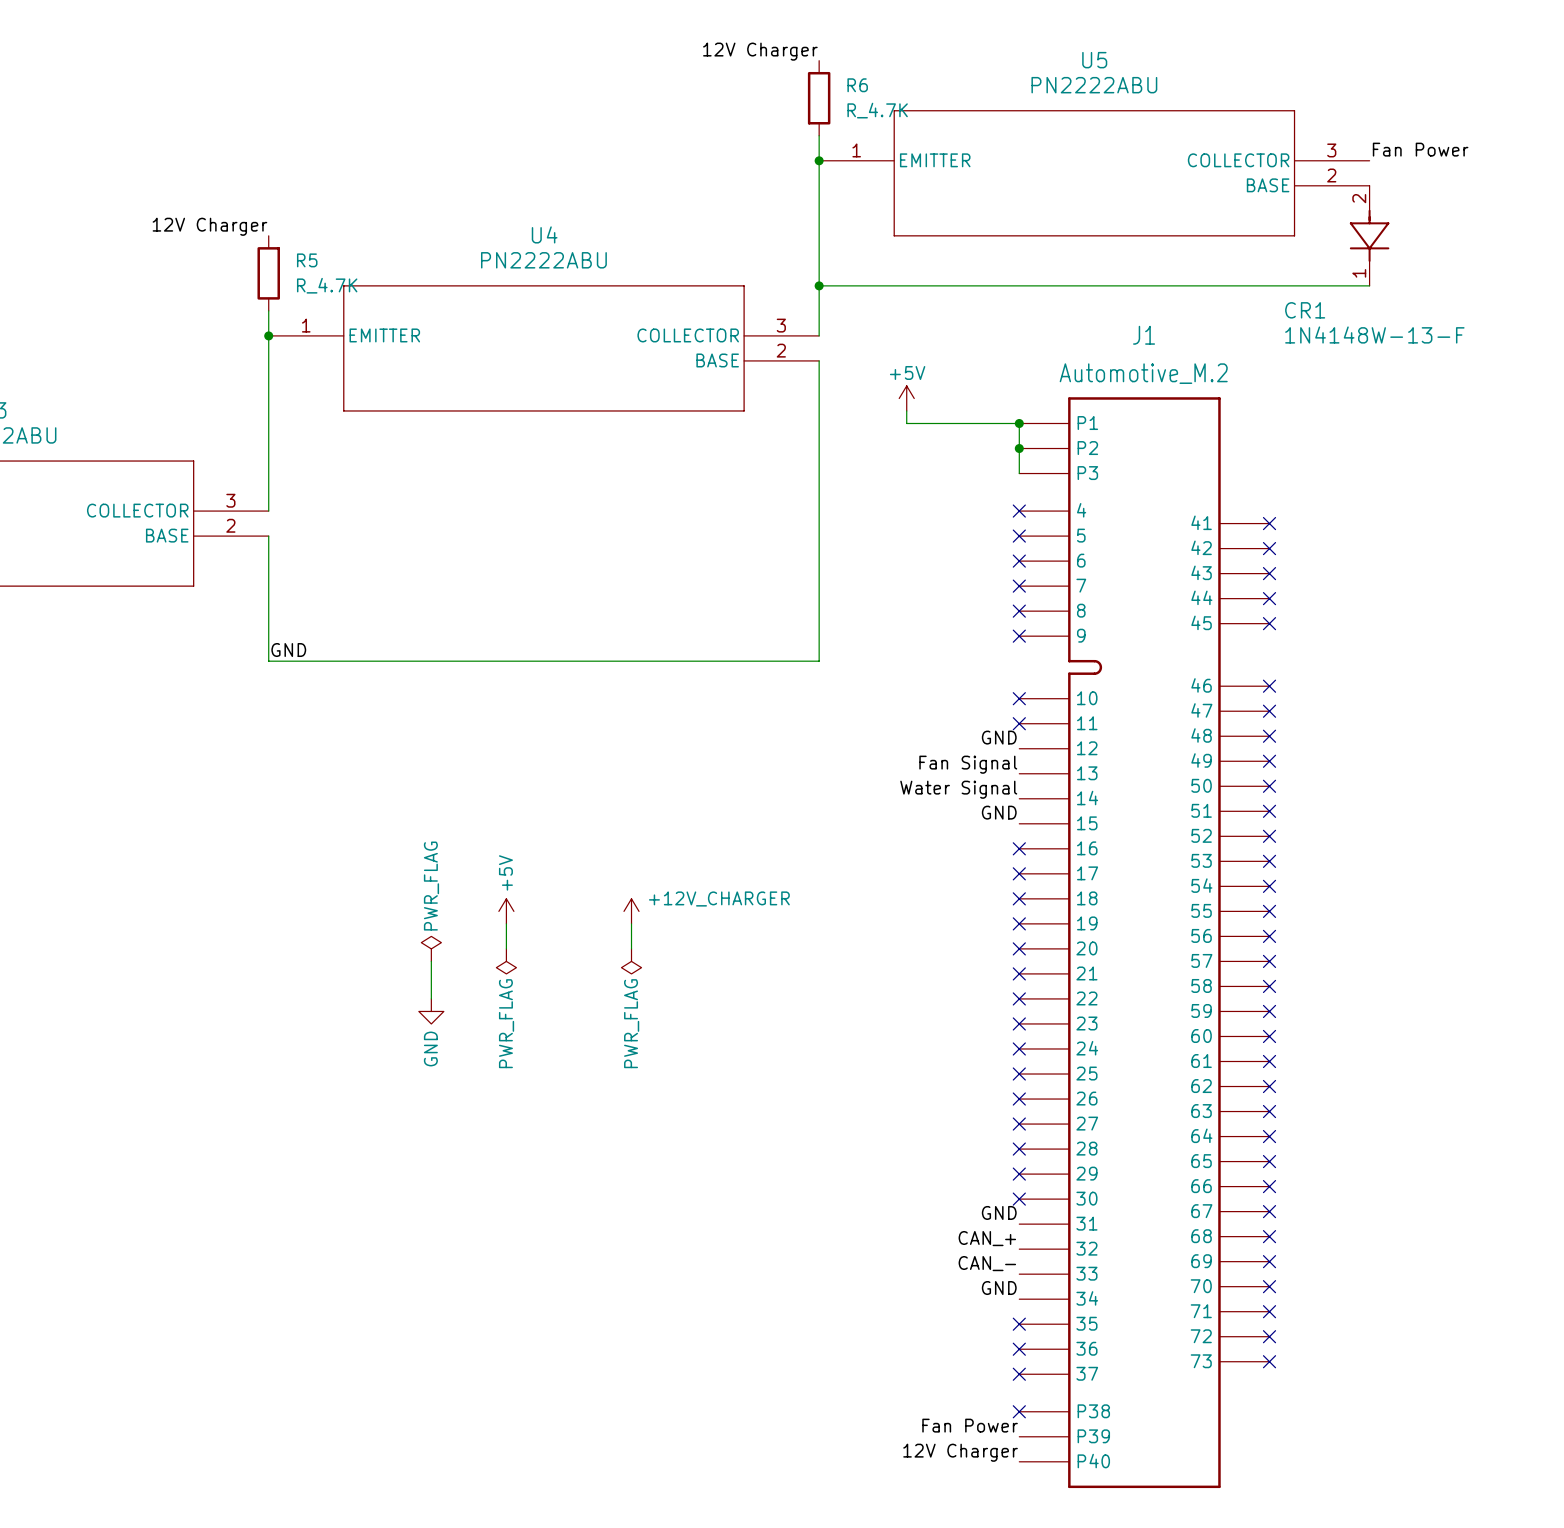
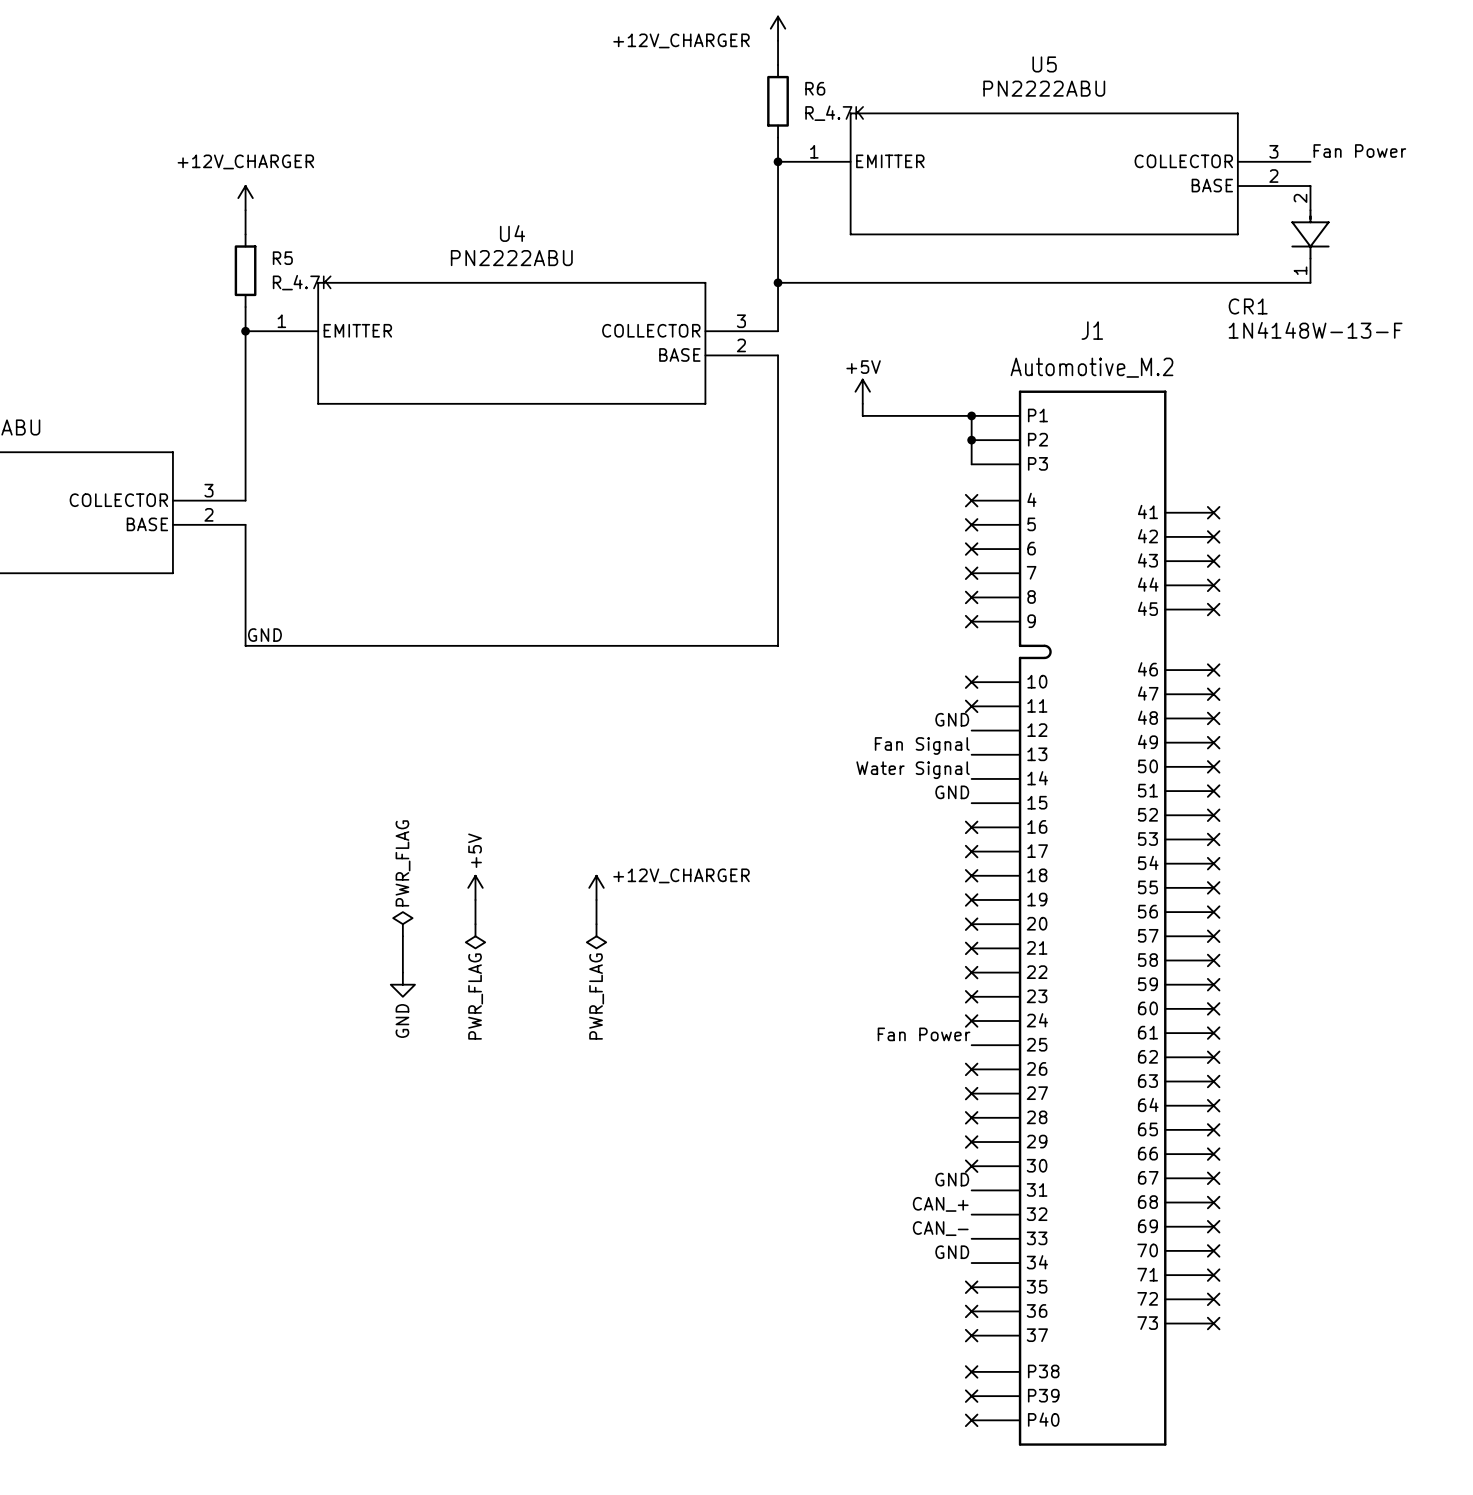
power symbol: none -> +12V_CHARGER (778, 28)
wire: none -> (778, 40) (778, 64)
label: 12V Charger (760, 51) -> none
power symbol: none -> +12V_CHARGER (245, 198)
wire: none -> (245, 210) (245, 234)
label: 12V Charger (209, 226) -> none
label: none -> Fan Power (924, 1034)
no-connect mark: (1019, 1074) -> none
label: Fan Power (970, 1425) -> none
no-connect mark: none -> (971, 1396)
label: 12V Charger (960, 1452) -> none
no-connect mark: none -> (971, 1420)

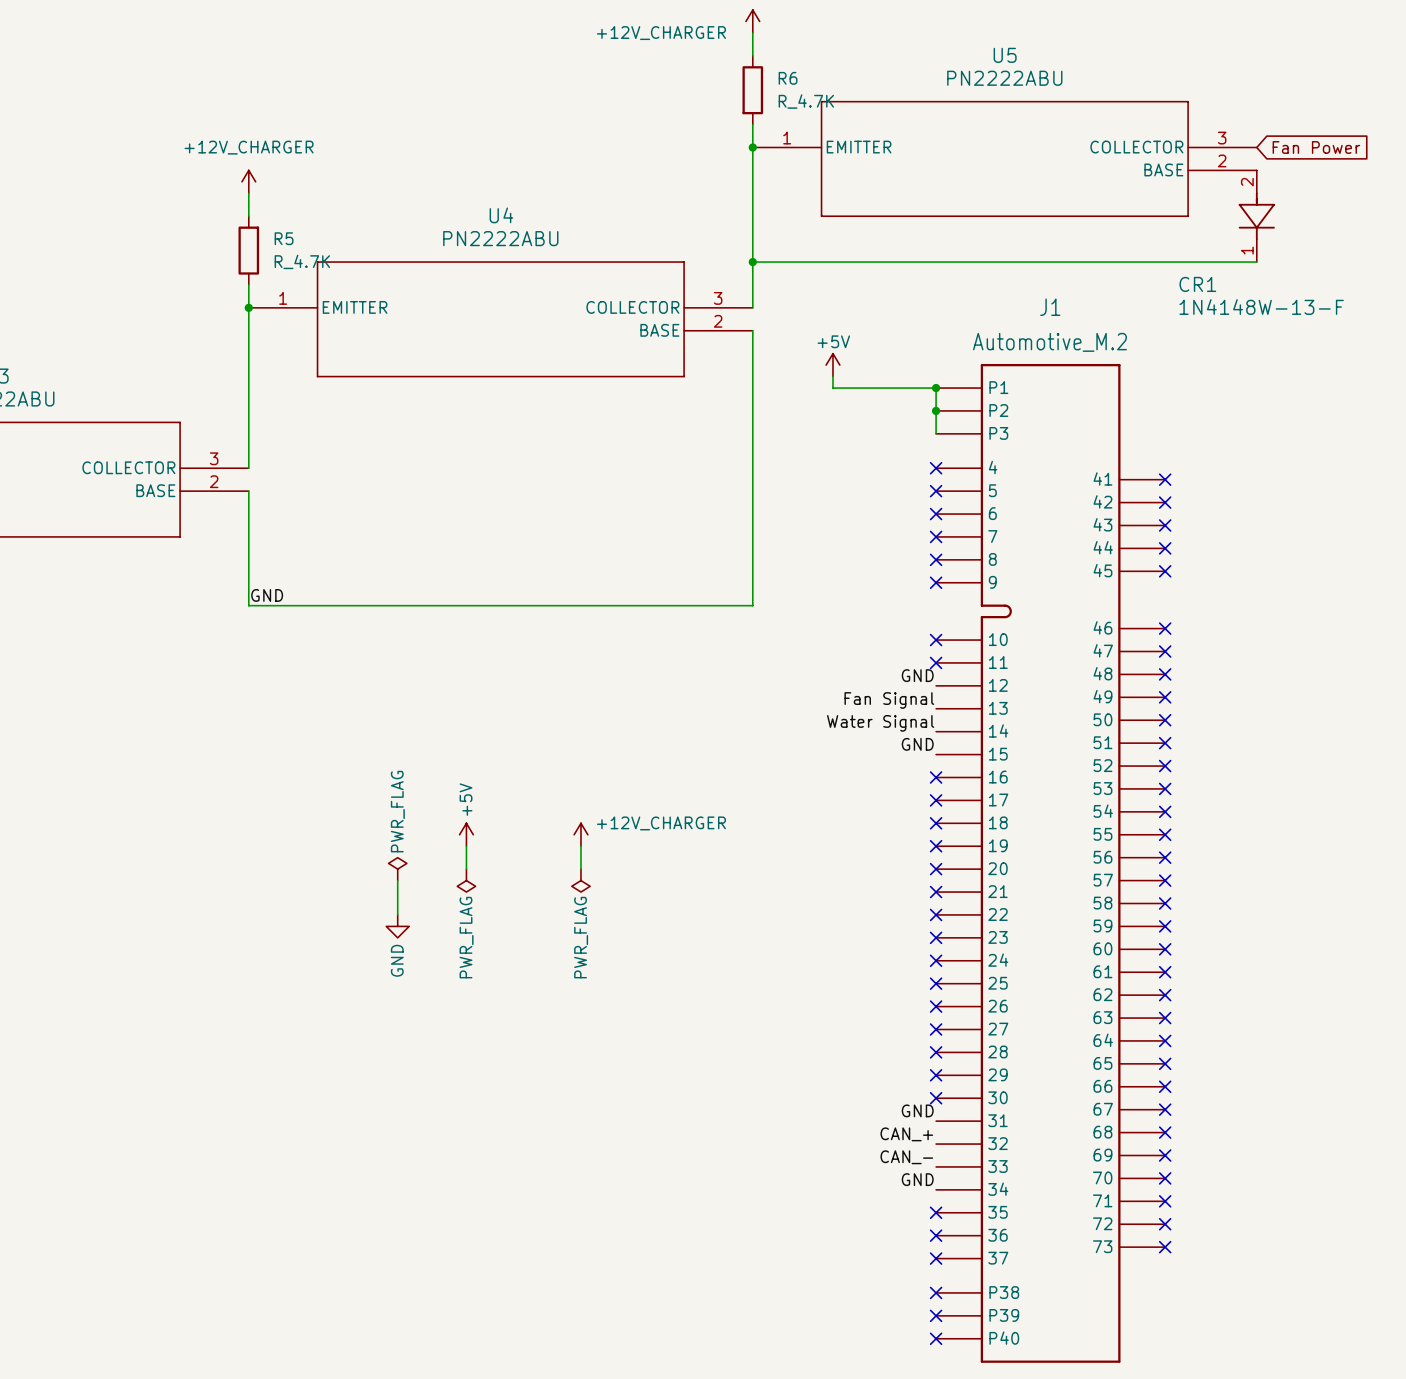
label: Fan Power (1359, 151) -> none
global label: none -> Fan Power (1316, 147)
label: Fan Power (924, 1034) -> none
no-connect mark: none -> (936, 983)

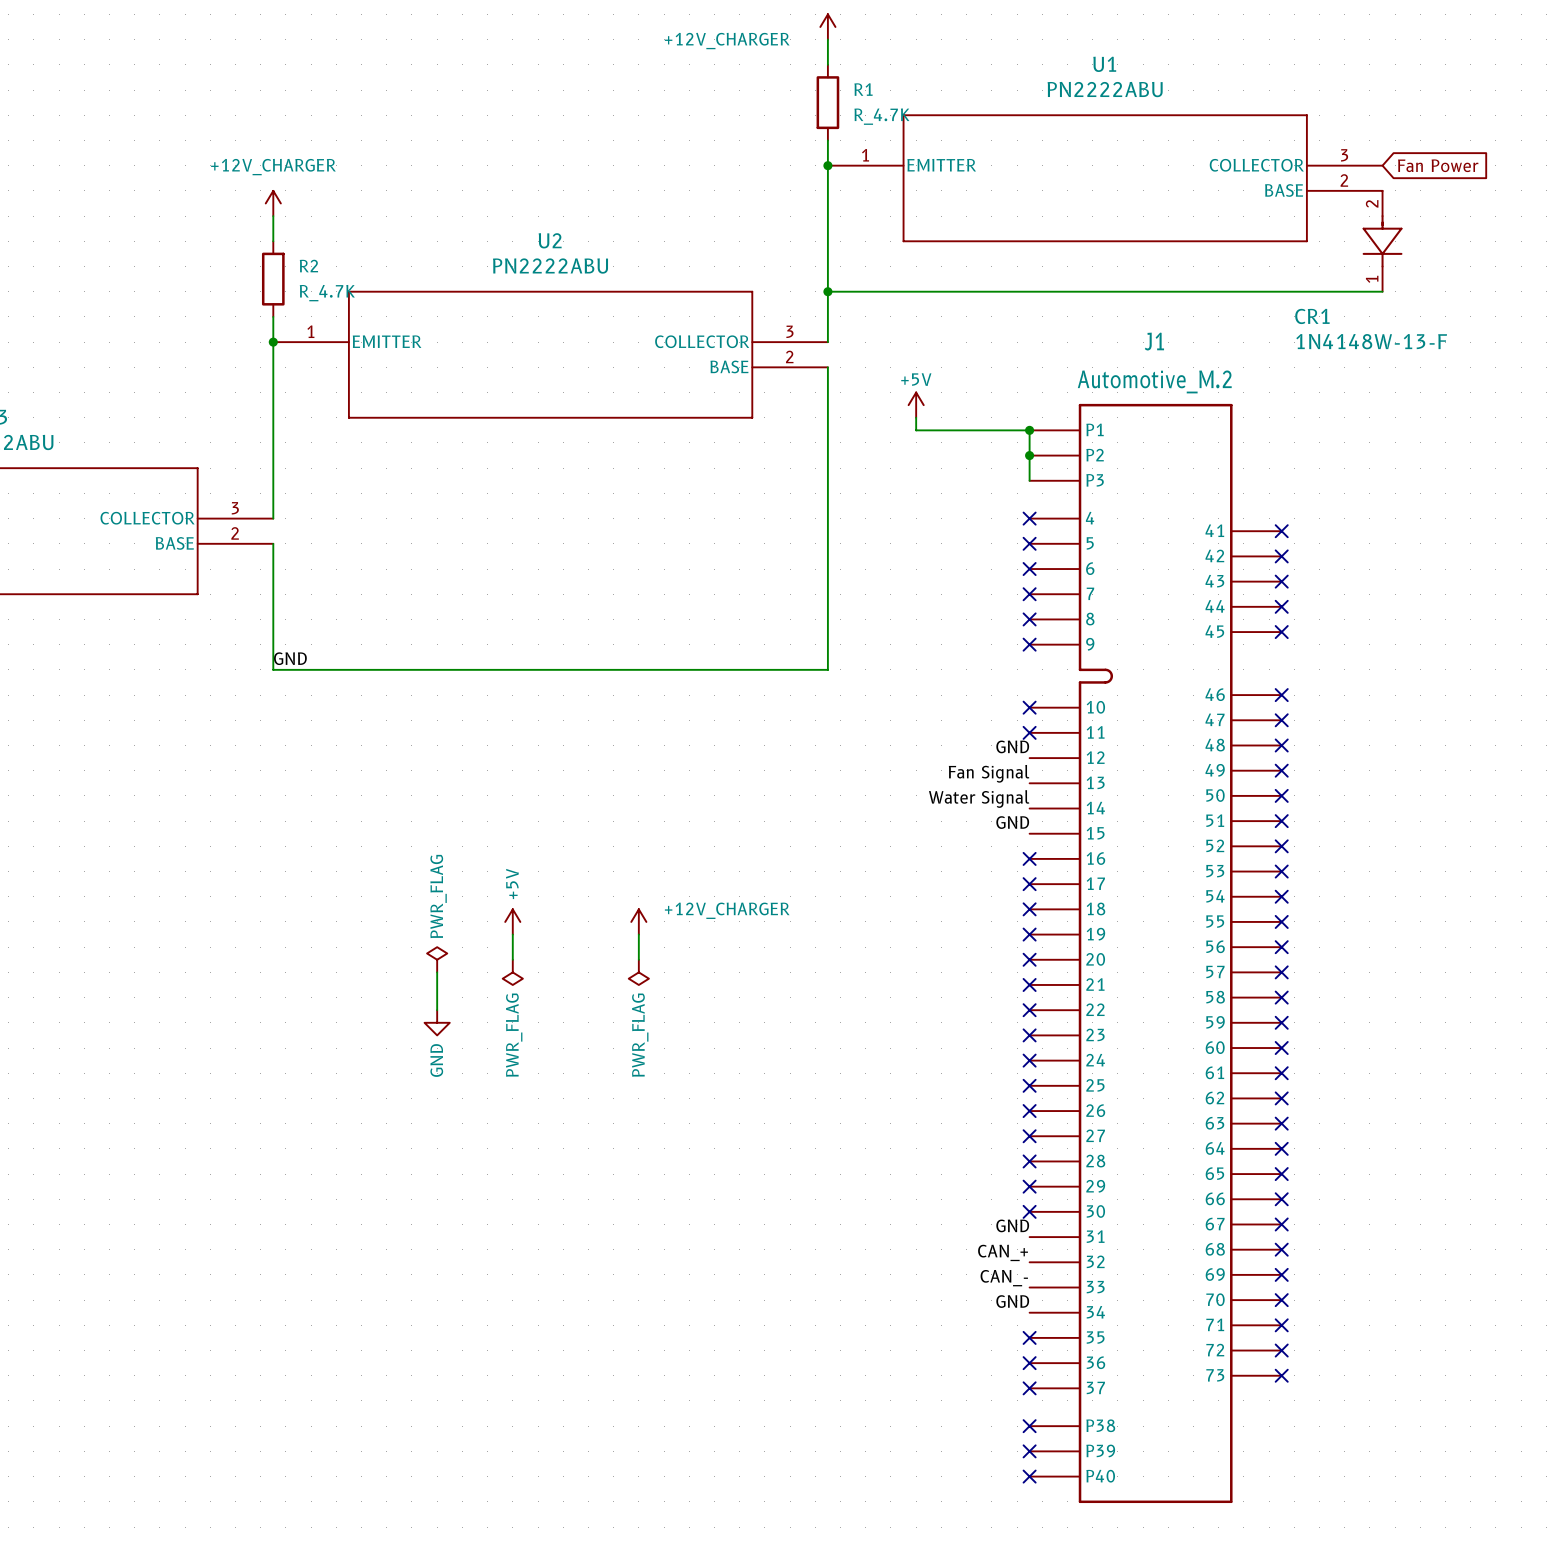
U5 name: U5 (1005, 55) -> U1 (1104, 64)
R6 name: R6 (788, 78) -> R1 (863, 89)
U4 name: U4 (501, 215) -> U2 (550, 240)
R5 name: R5 (284, 238) -> R2 (308, 266)

